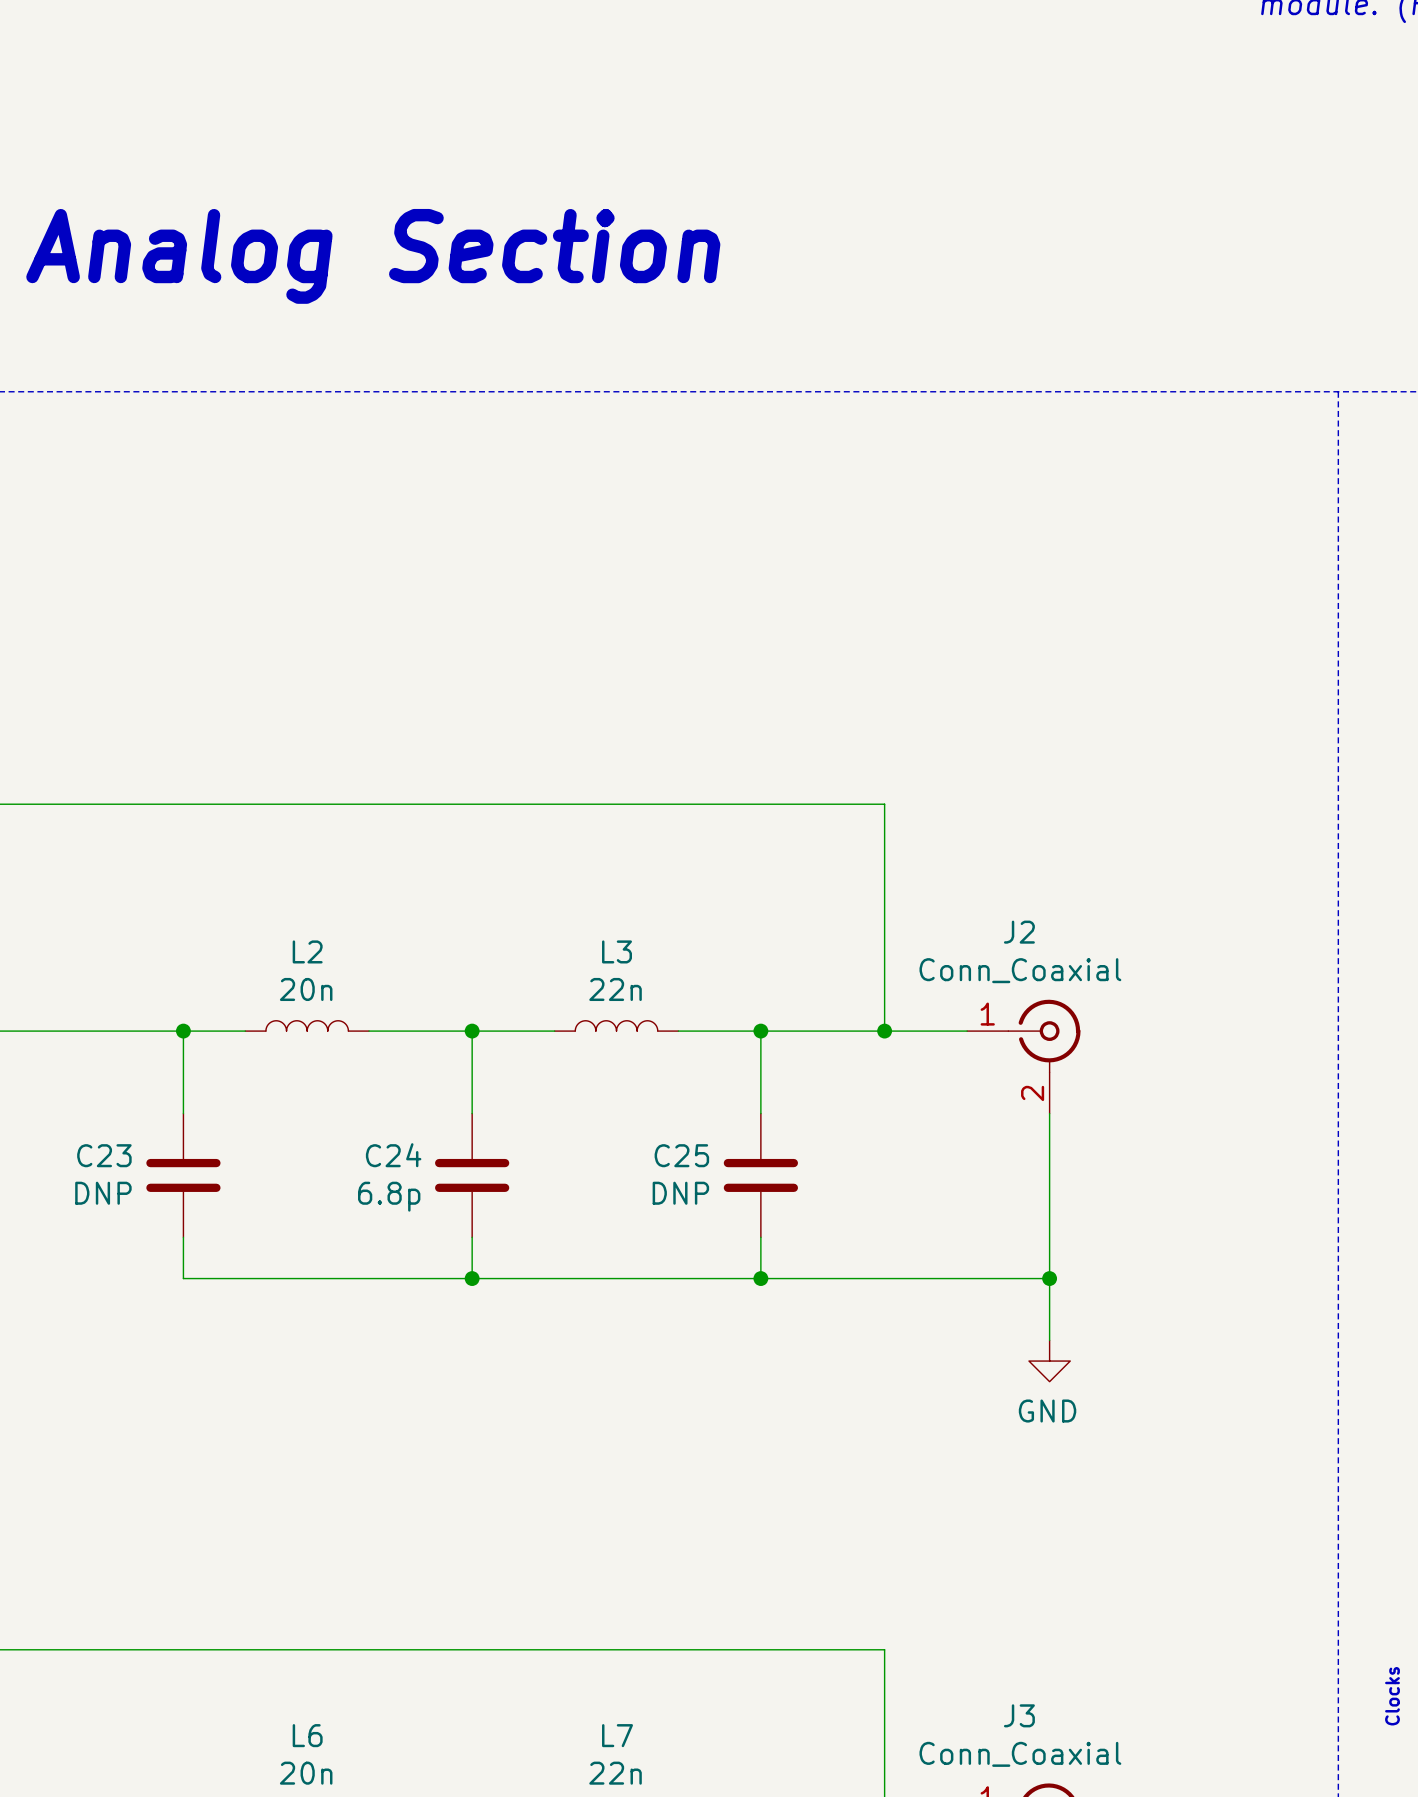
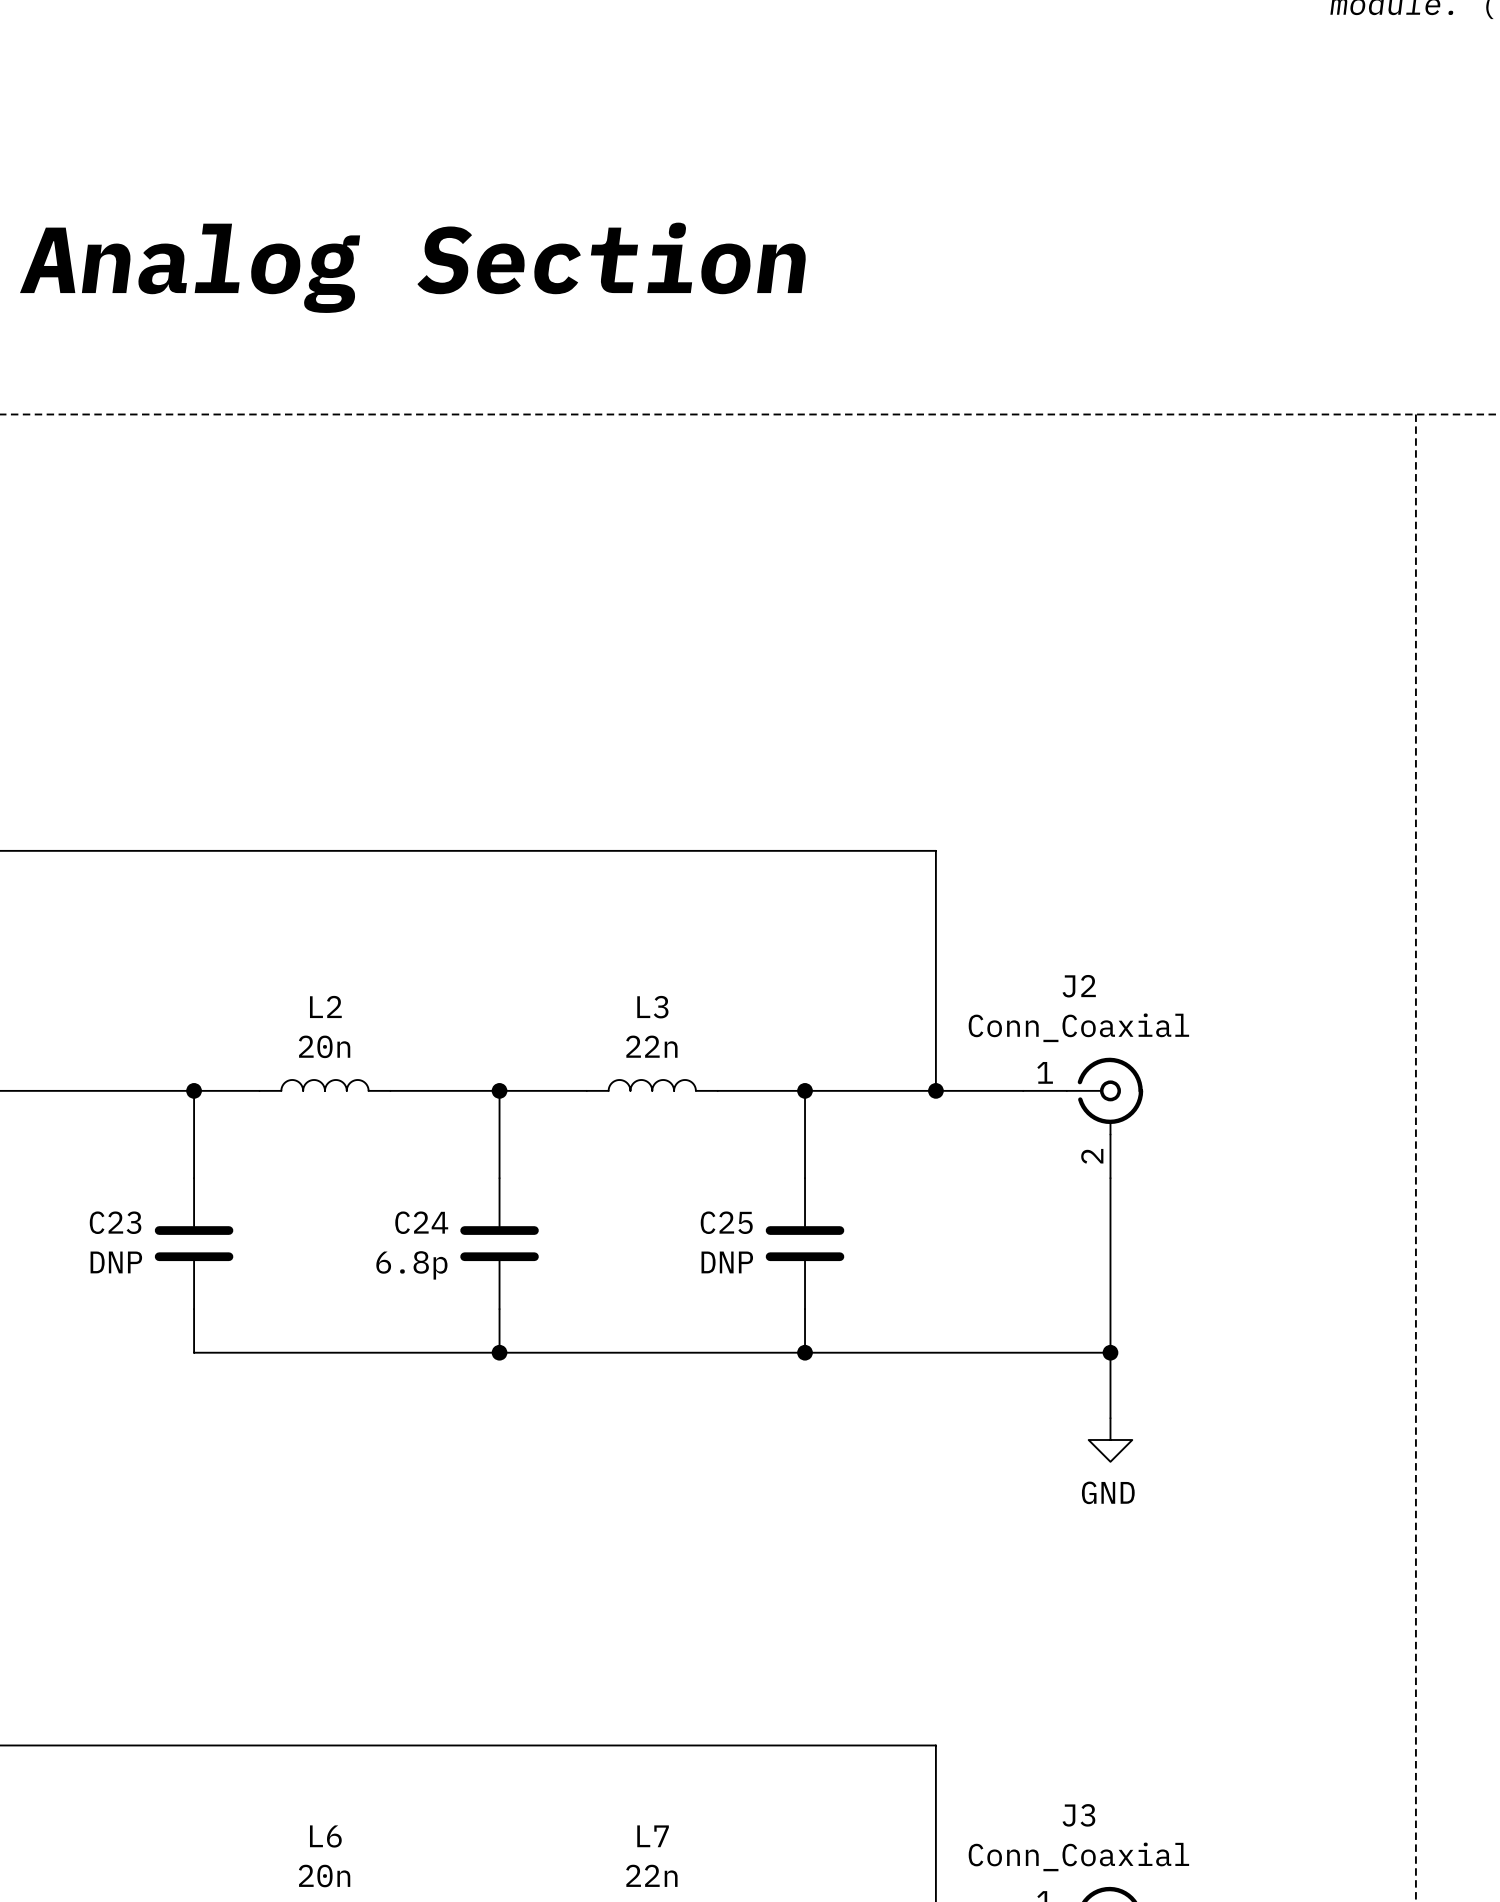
text: Clocks (1392, 1696) -> none

